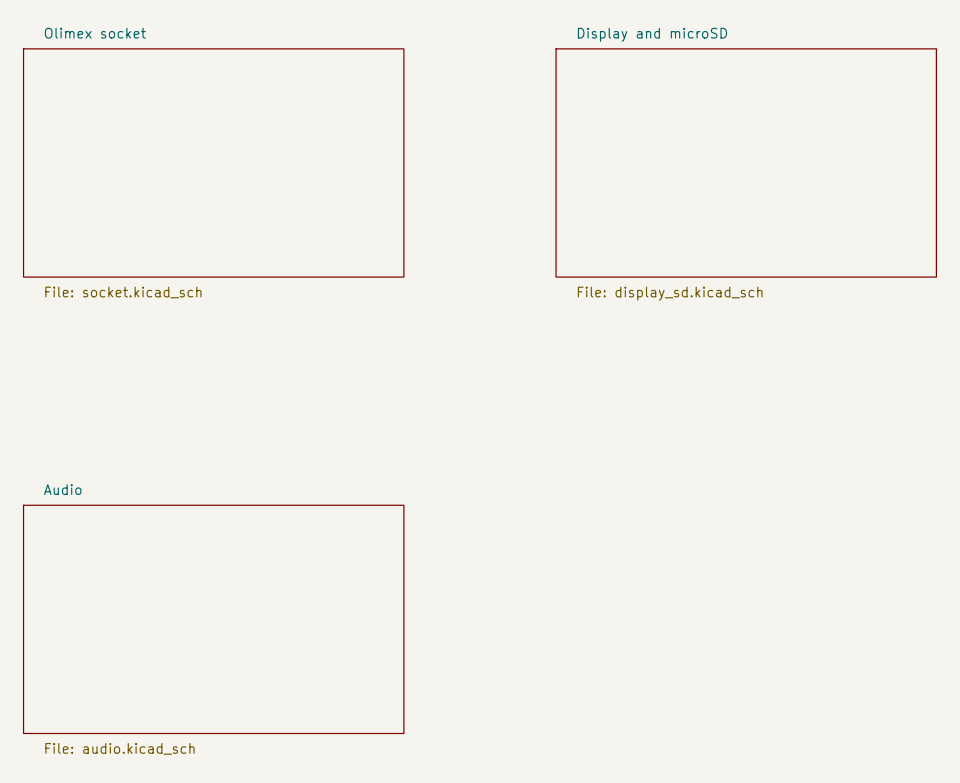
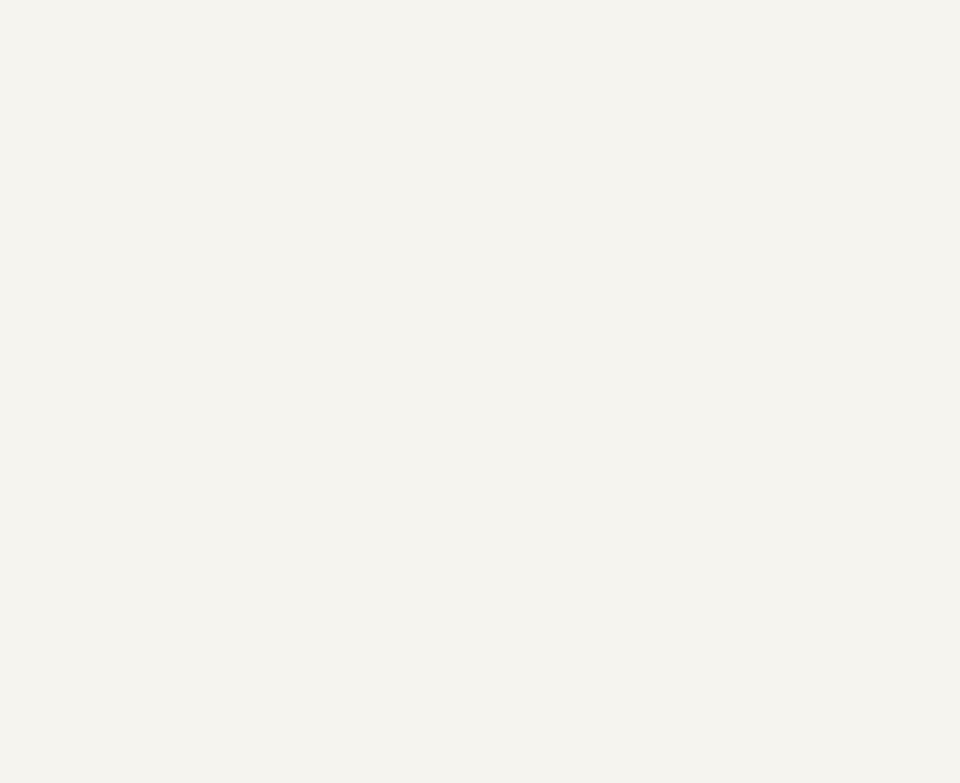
sheet Olimex socket: File: socket.kicad_sch (213, 162) -> none
sheet Display and microSD: File: display_sd.kicad_sch (746, 162) -> none
sheet Audio: File: audio.kicad_sch (213, 619) -> none

